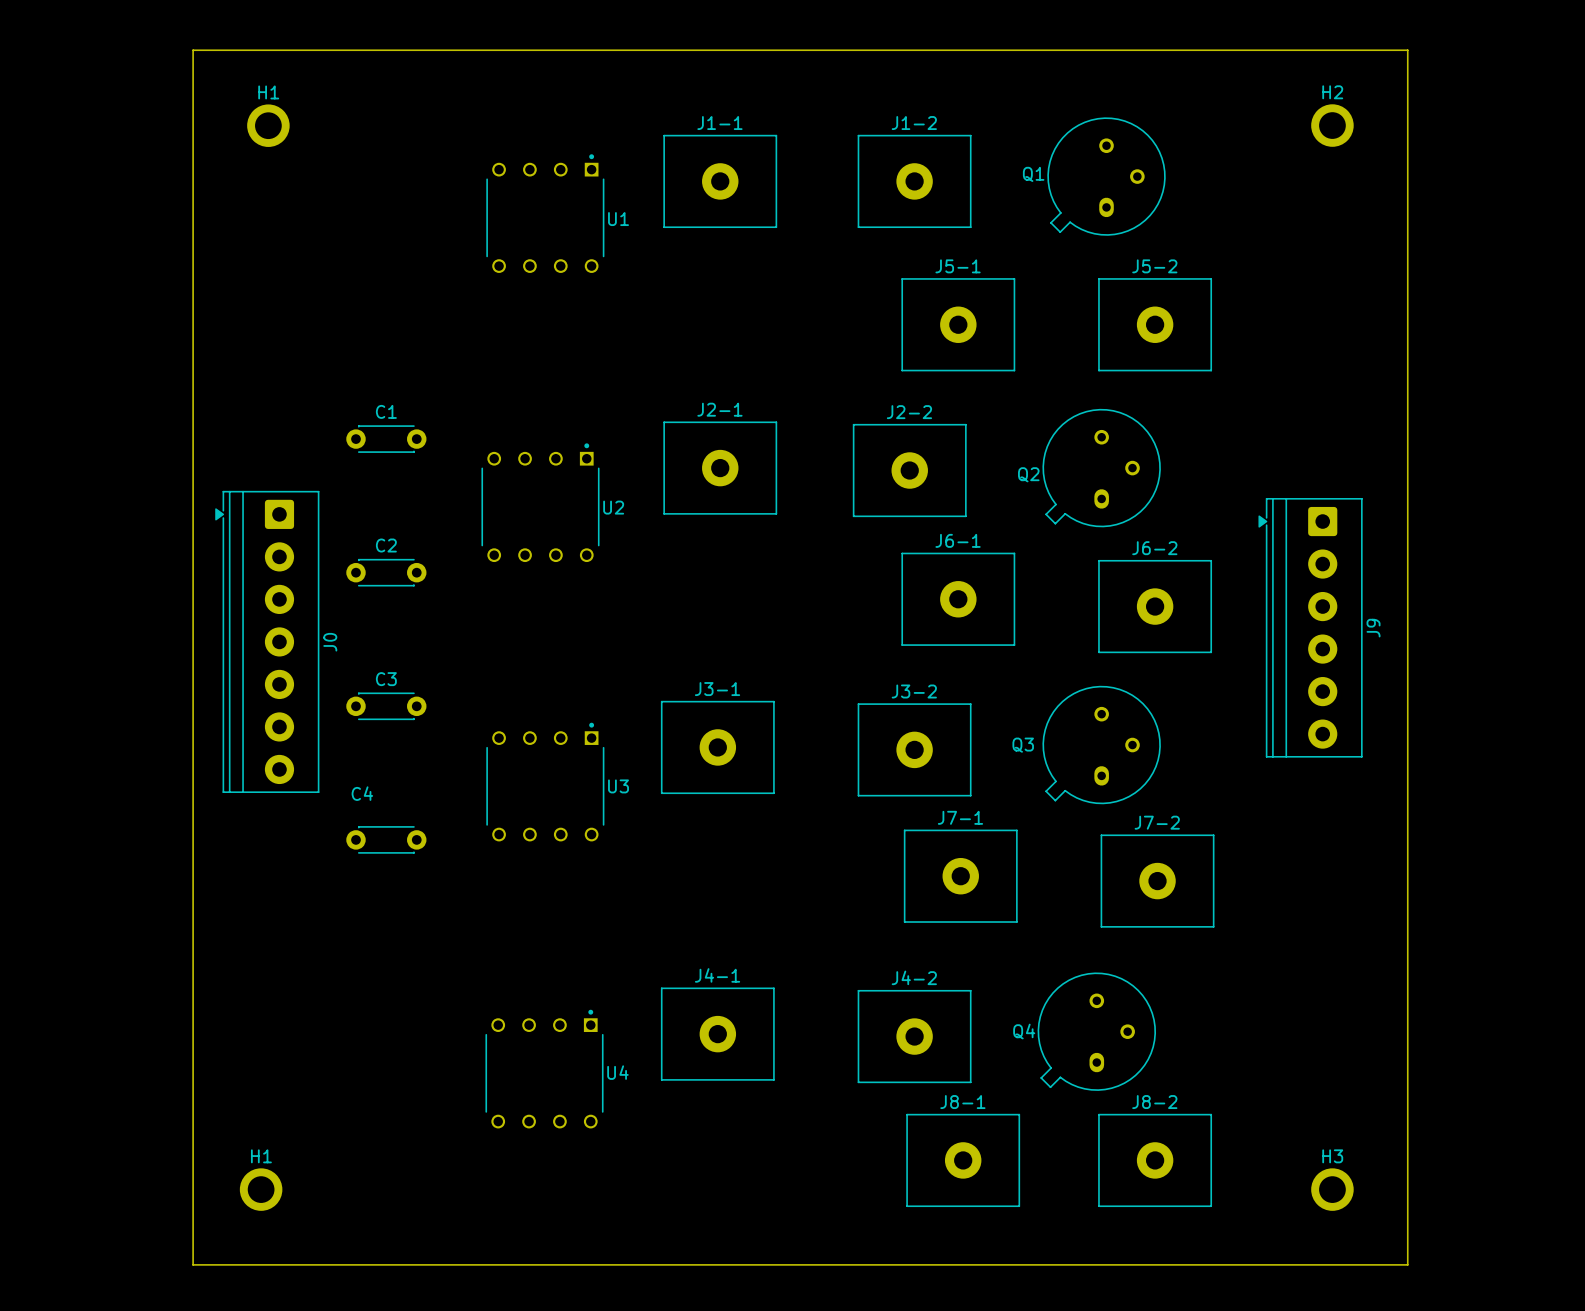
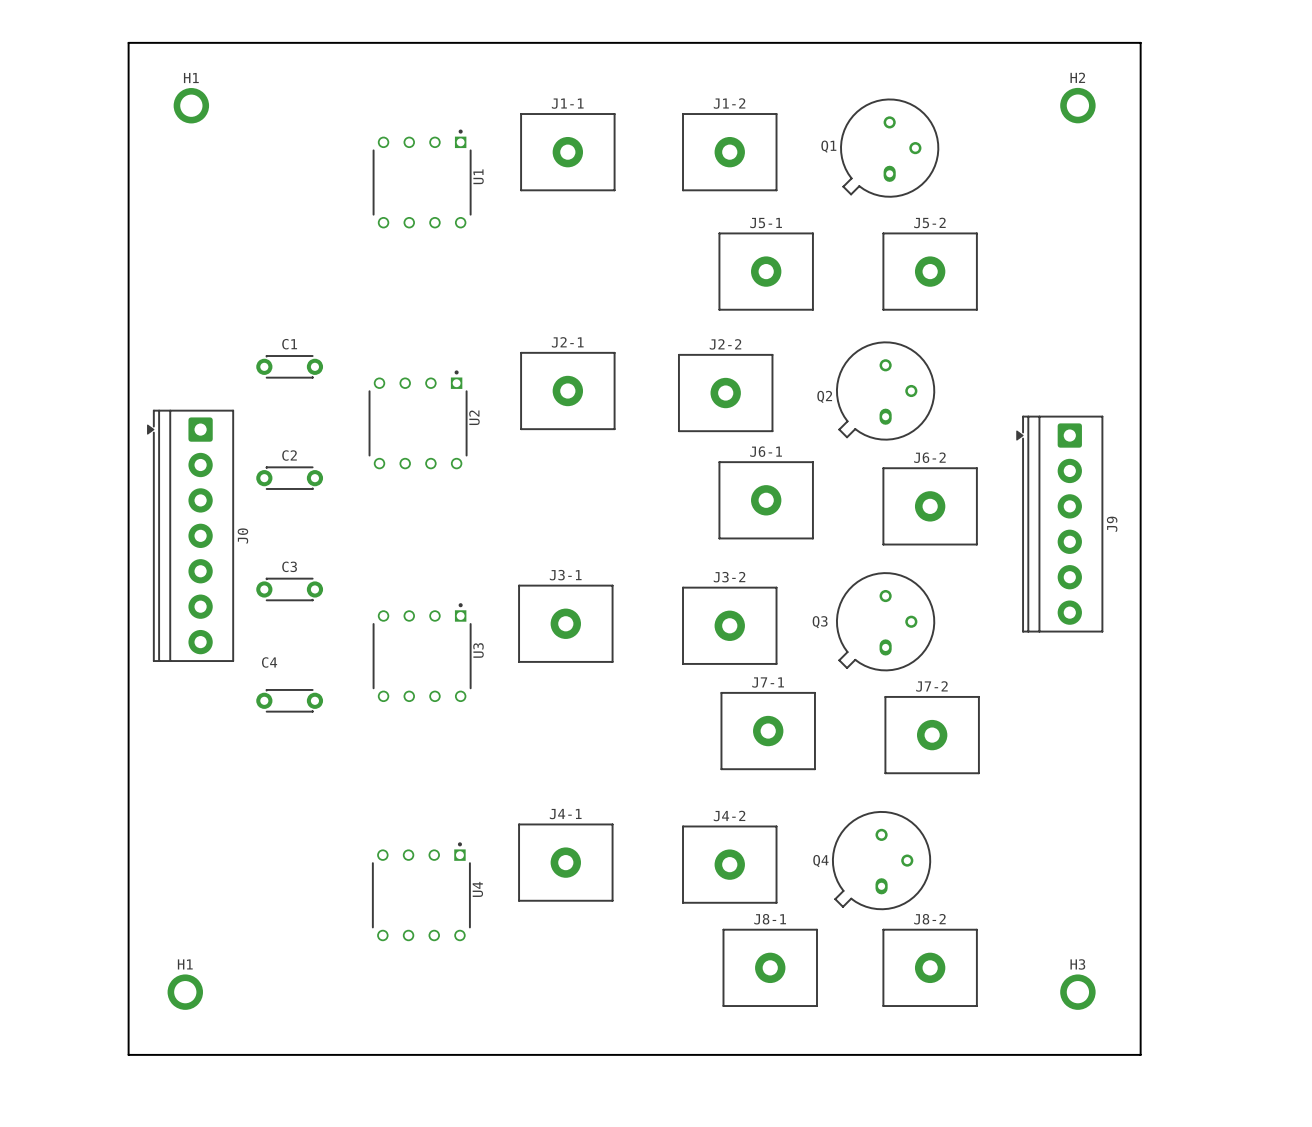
U1 name rotation: 0° (618, 219) -> 90° counterclockwise (478, 176)
U2 name rotation: 0° (613, 507) -> 90° counterclockwise (474, 417)
U3 name rotation: 0° (618, 786) -> 90° counterclockwise (478, 650)
U4 name rotation: 0° (617, 1072) -> 90° counterclockwise (477, 889)

